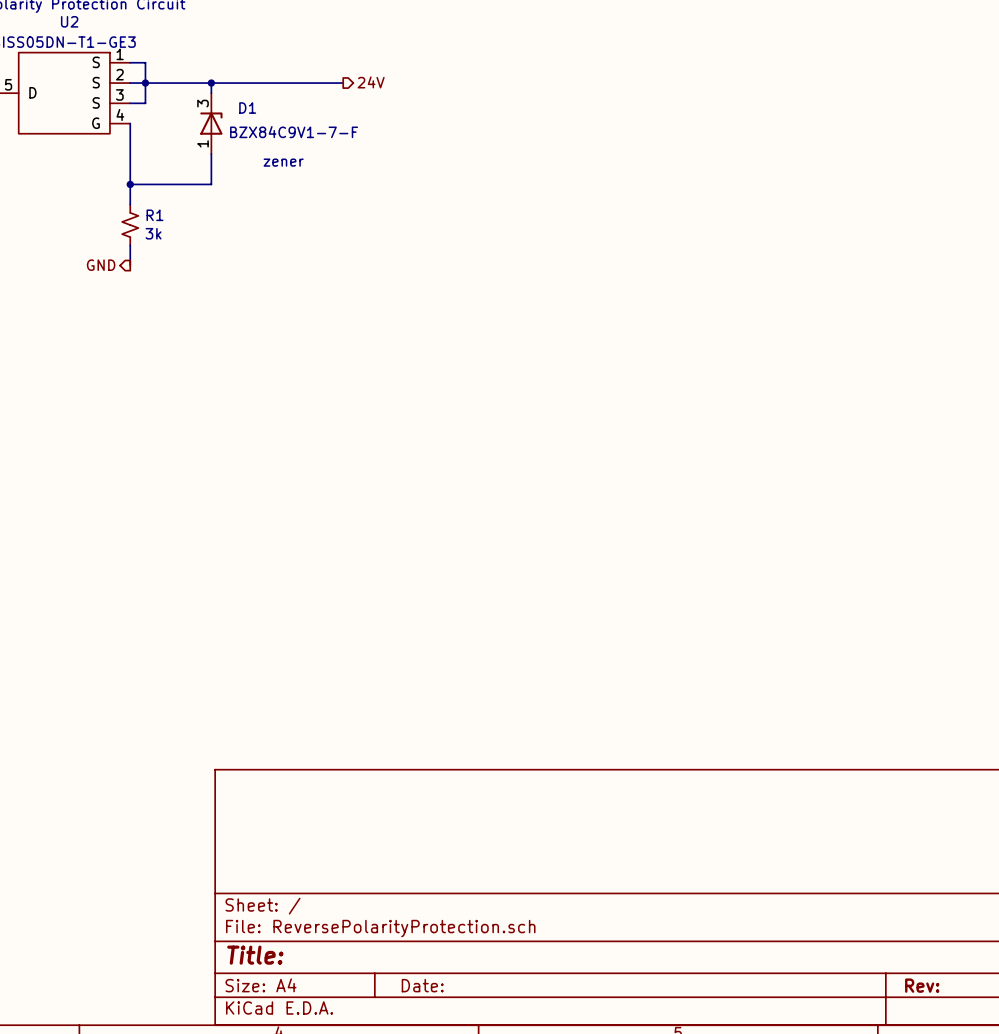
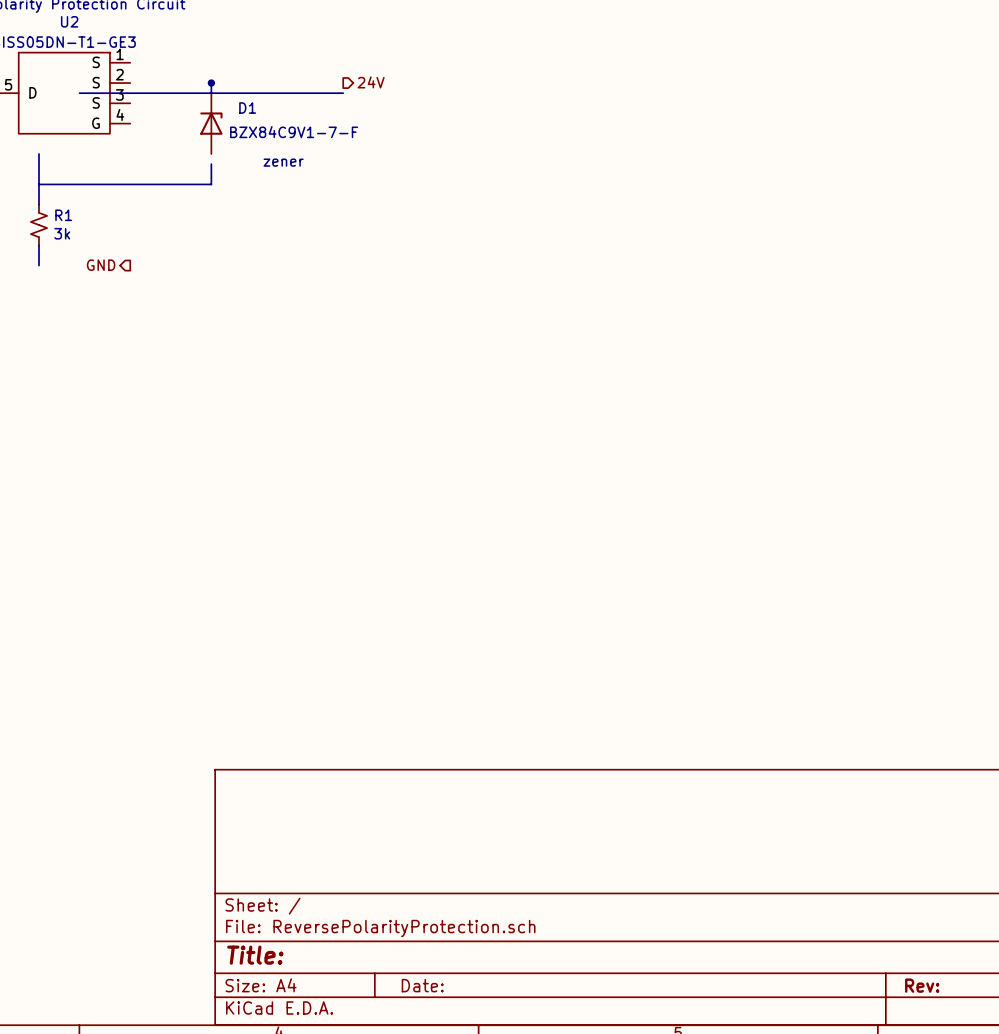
wire: (130, 62) (145, 62) (145, 103) (130, 103) -> none
wire: (130, 83) (343, 83) -> none
junction: (145, 83) -> none
wire: none -> (79, 93) (343, 93)
D1 pin number: 3 (203, 103) -> none
wire: (130, 123) (130, 204) -> none
D1 pin number: 1 (203, 143) -> none
wire: none -> (38, 154) (38, 204)
wire: (211, 154) (211, 164) -> none
wire: none -> (38, 184) (130, 184)
junction: (130, 184) -> none
R1 position: (130, 225) -> (38, 225)
wire: (130, 245) (130, 265) -> (38, 245) (38, 265)

